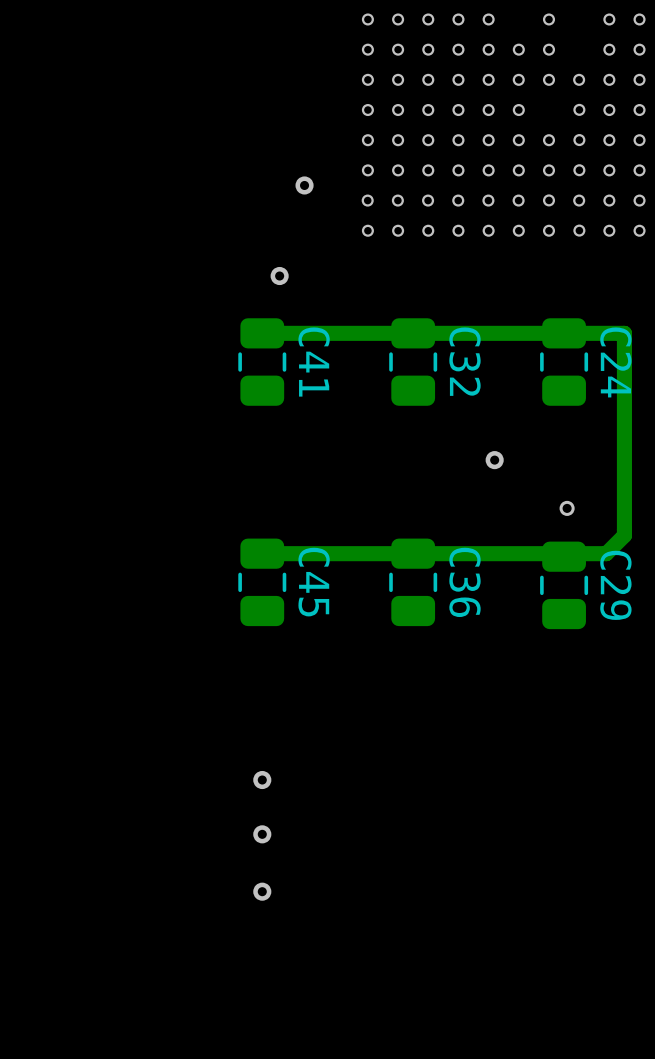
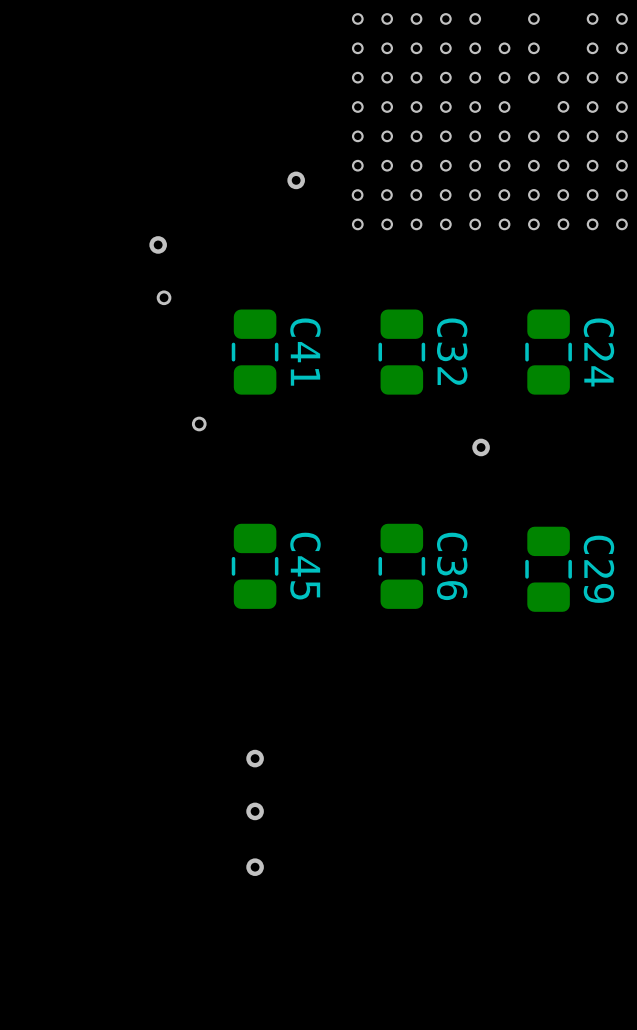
via position: (279, 276) -> (158, 244)
via: none -> (164, 297)
track: (262, 333) (624, 333) (624, 535) (606, 553) (262, 553) -> none
via: none -> (199, 423)
via: (567, 508) -> none

